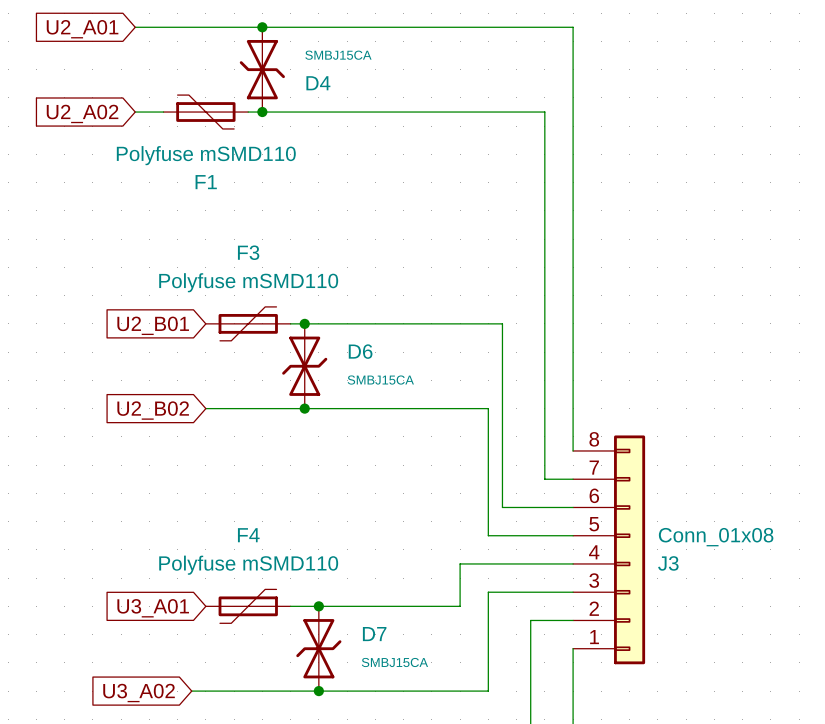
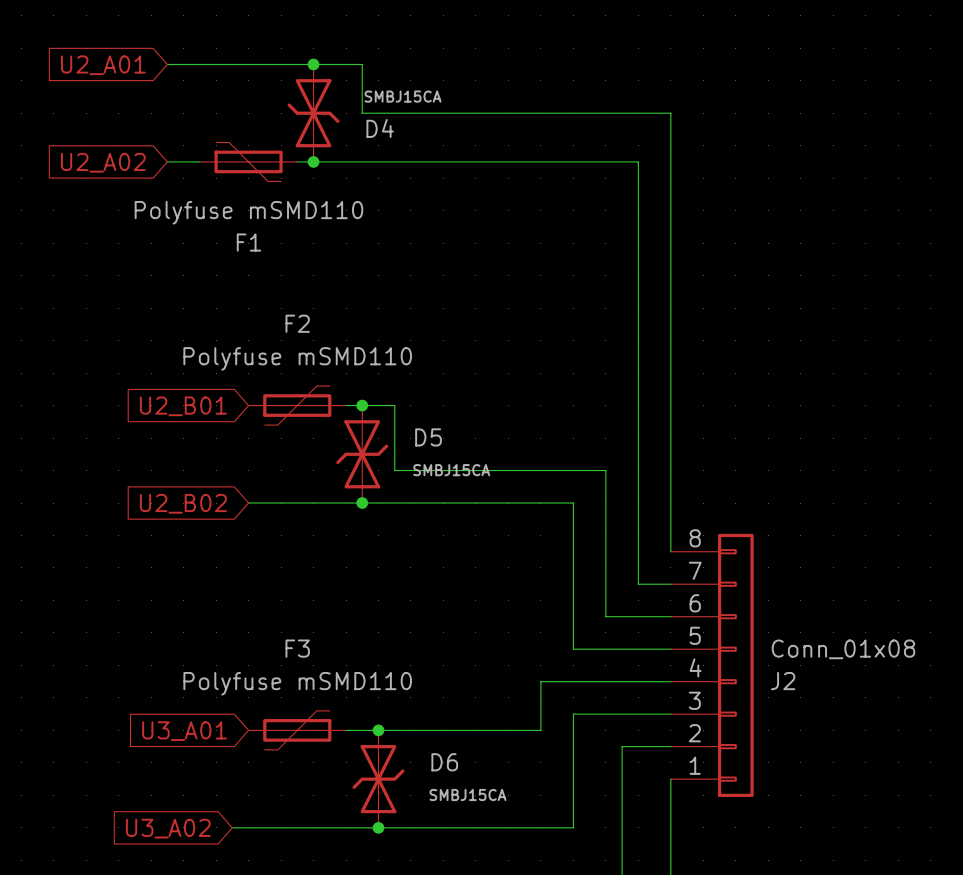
wire: (304, 27) (573, 27) (573, 69) -> (362, 64) (362, 113) (670, 113)
F3 name: F3 (248, 252) -> F2 (297, 323)
wire: (332, 323) (502, 323) (502, 507) (516, 507) -> (394, 405) (394, 470) (605, 470) (605, 616)
D6 name: D6 (360, 351) -> D5 (428, 437)
F4 name: F4 (248, 535) -> F3 (297, 648)
J3 name: J3 (668, 563) -> J2 (783, 681)
D7 name: D7 (374, 634) -> D6 (444, 762)

